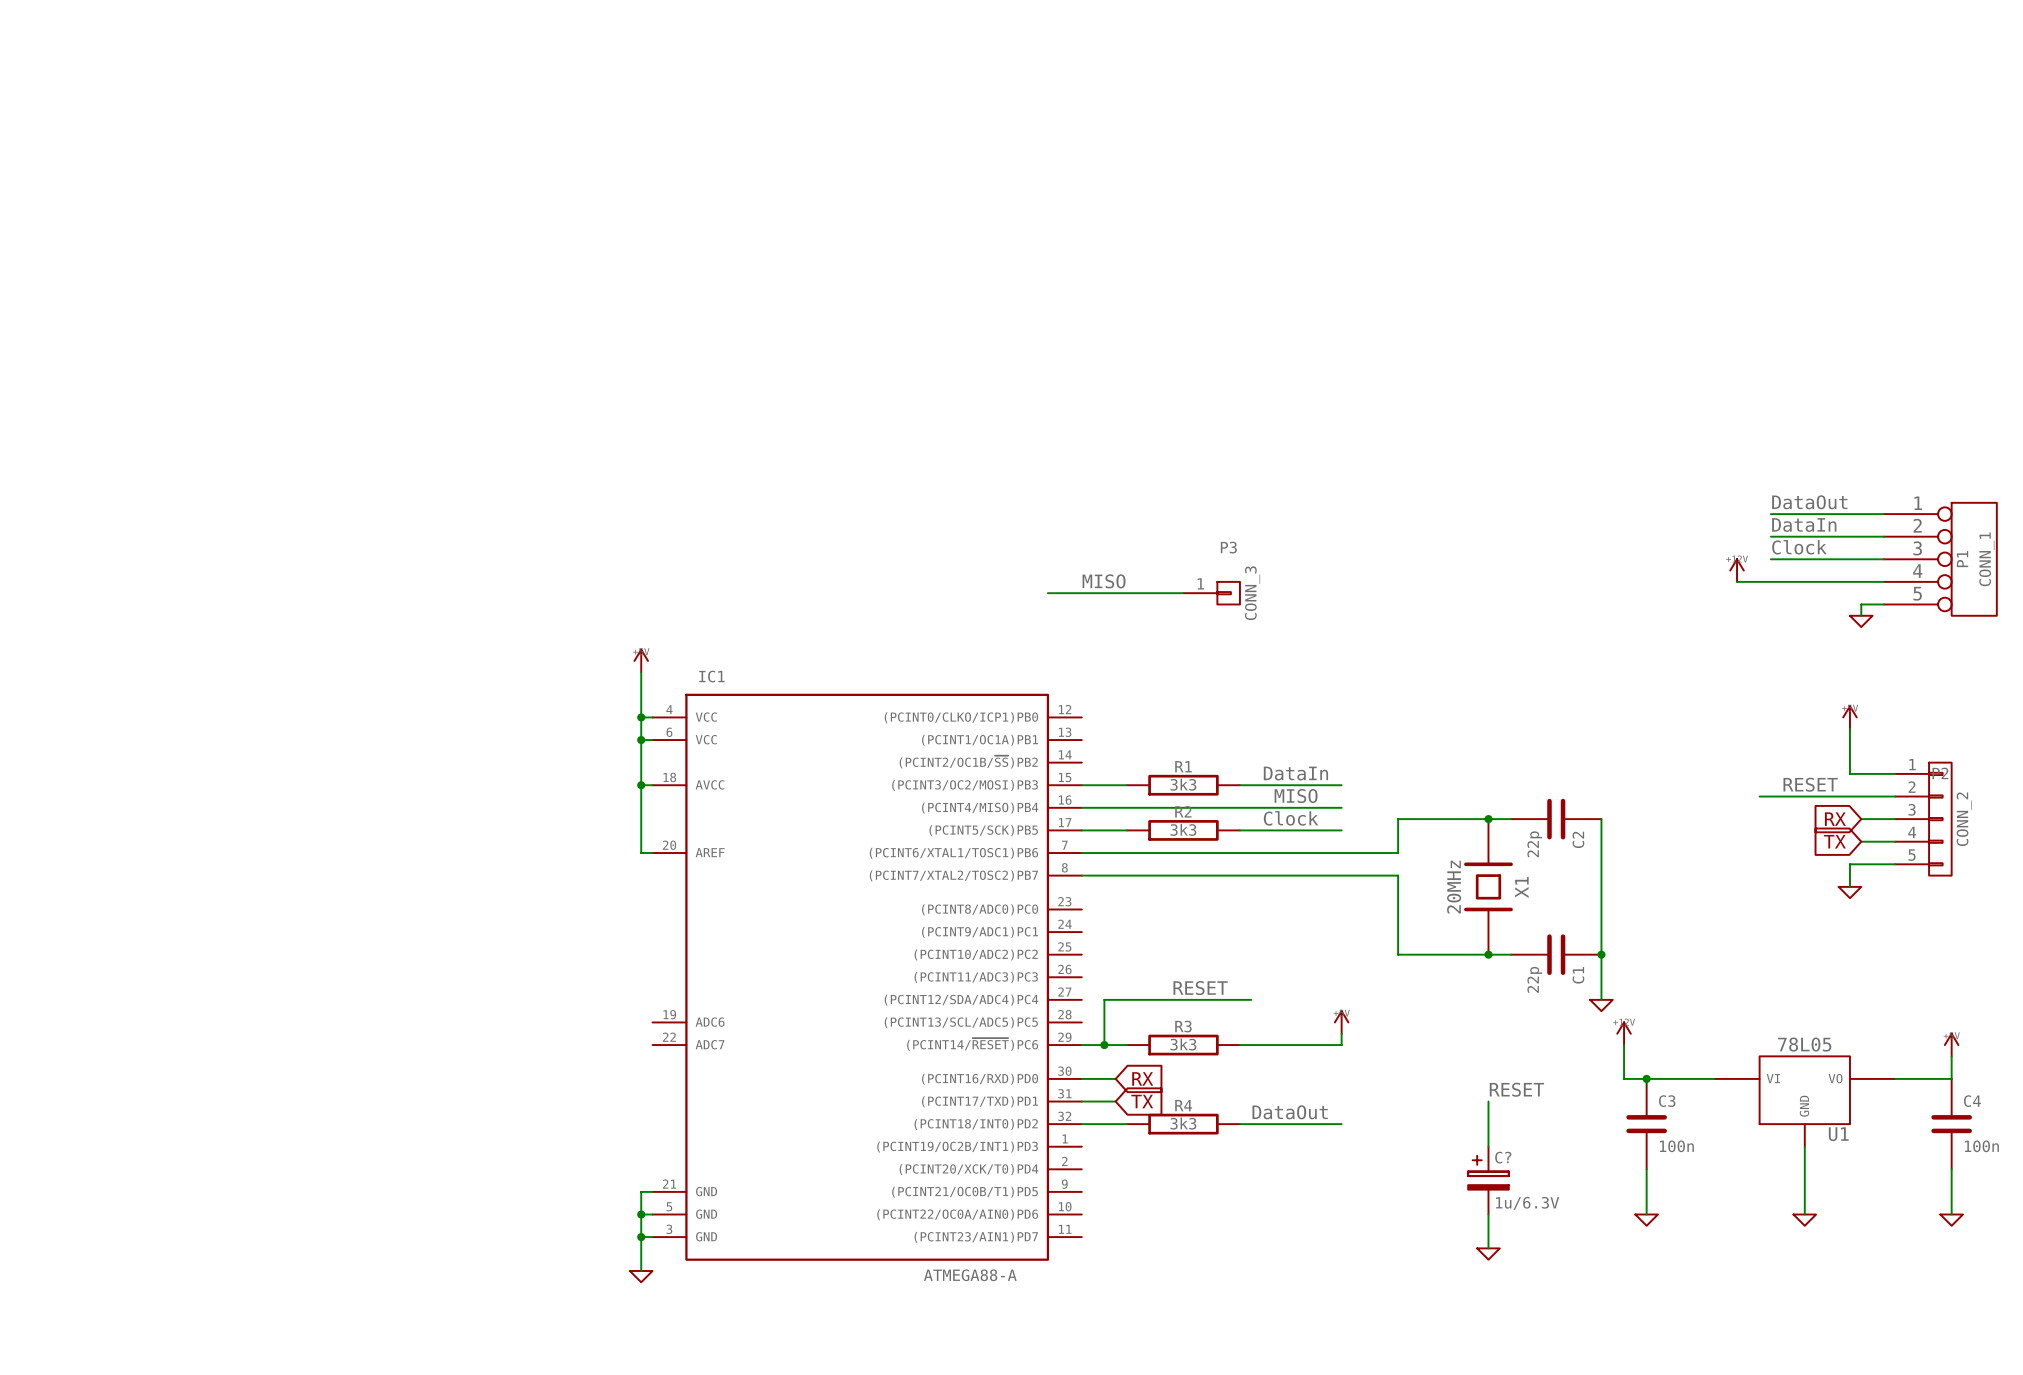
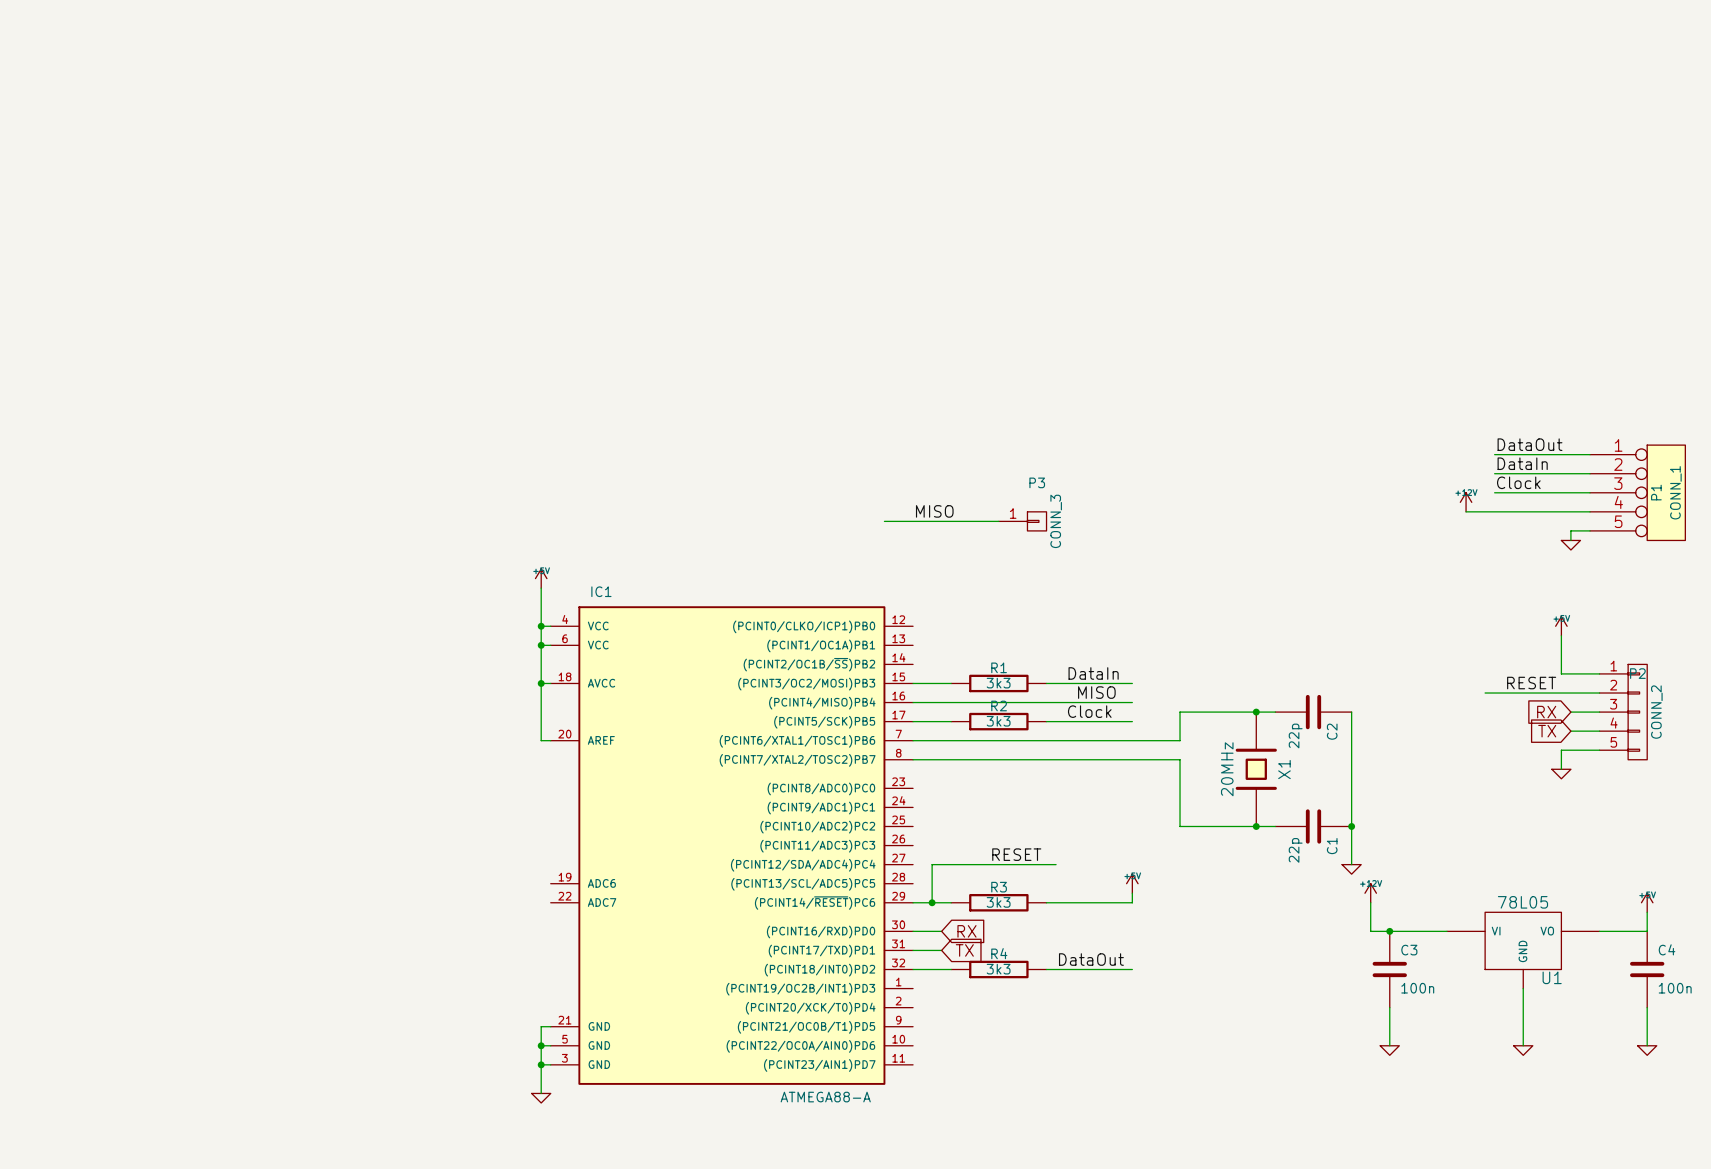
label: RESET (1516, 1089) -> none
wire: (1488, 1101) (1488, 1146) -> none
C?: 1u/6.3V (1488, 1180) -> none
wire: (1488, 1214) (1488, 1248) -> none
power symbol: (1488, 1254) -> none

